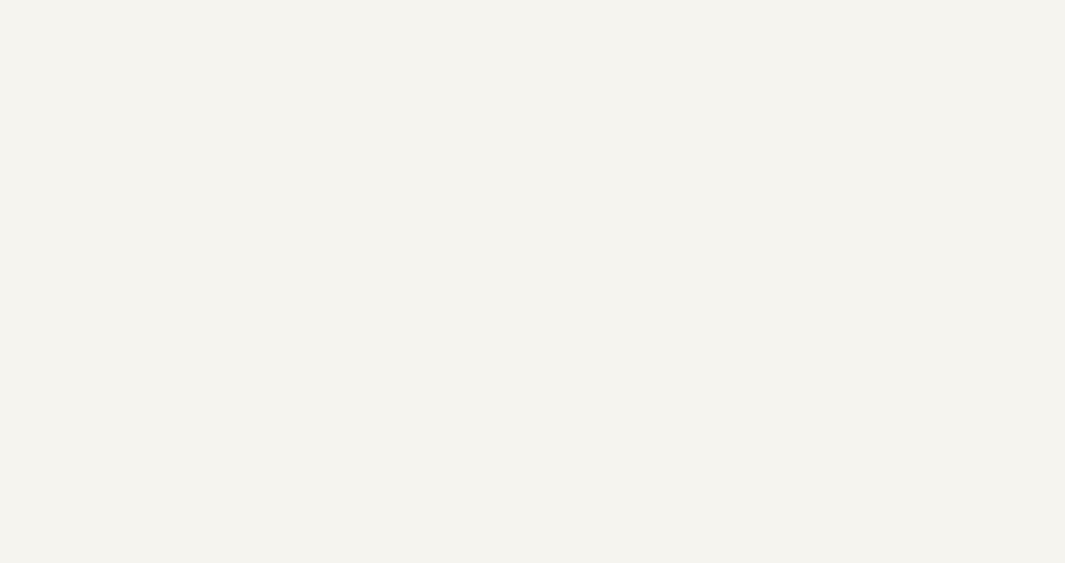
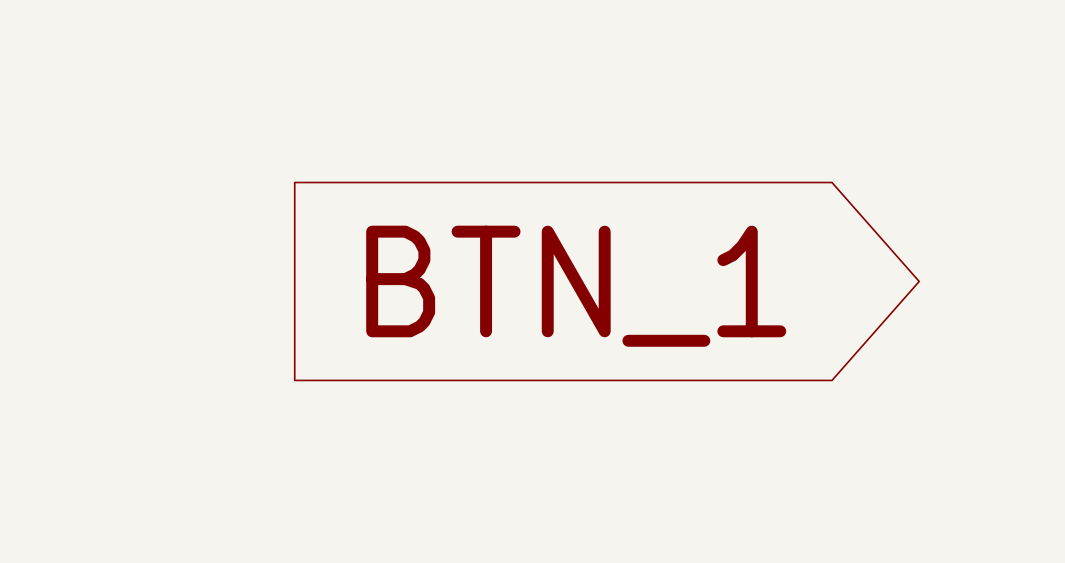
global label: none -> BTN_1 (576, 286)

